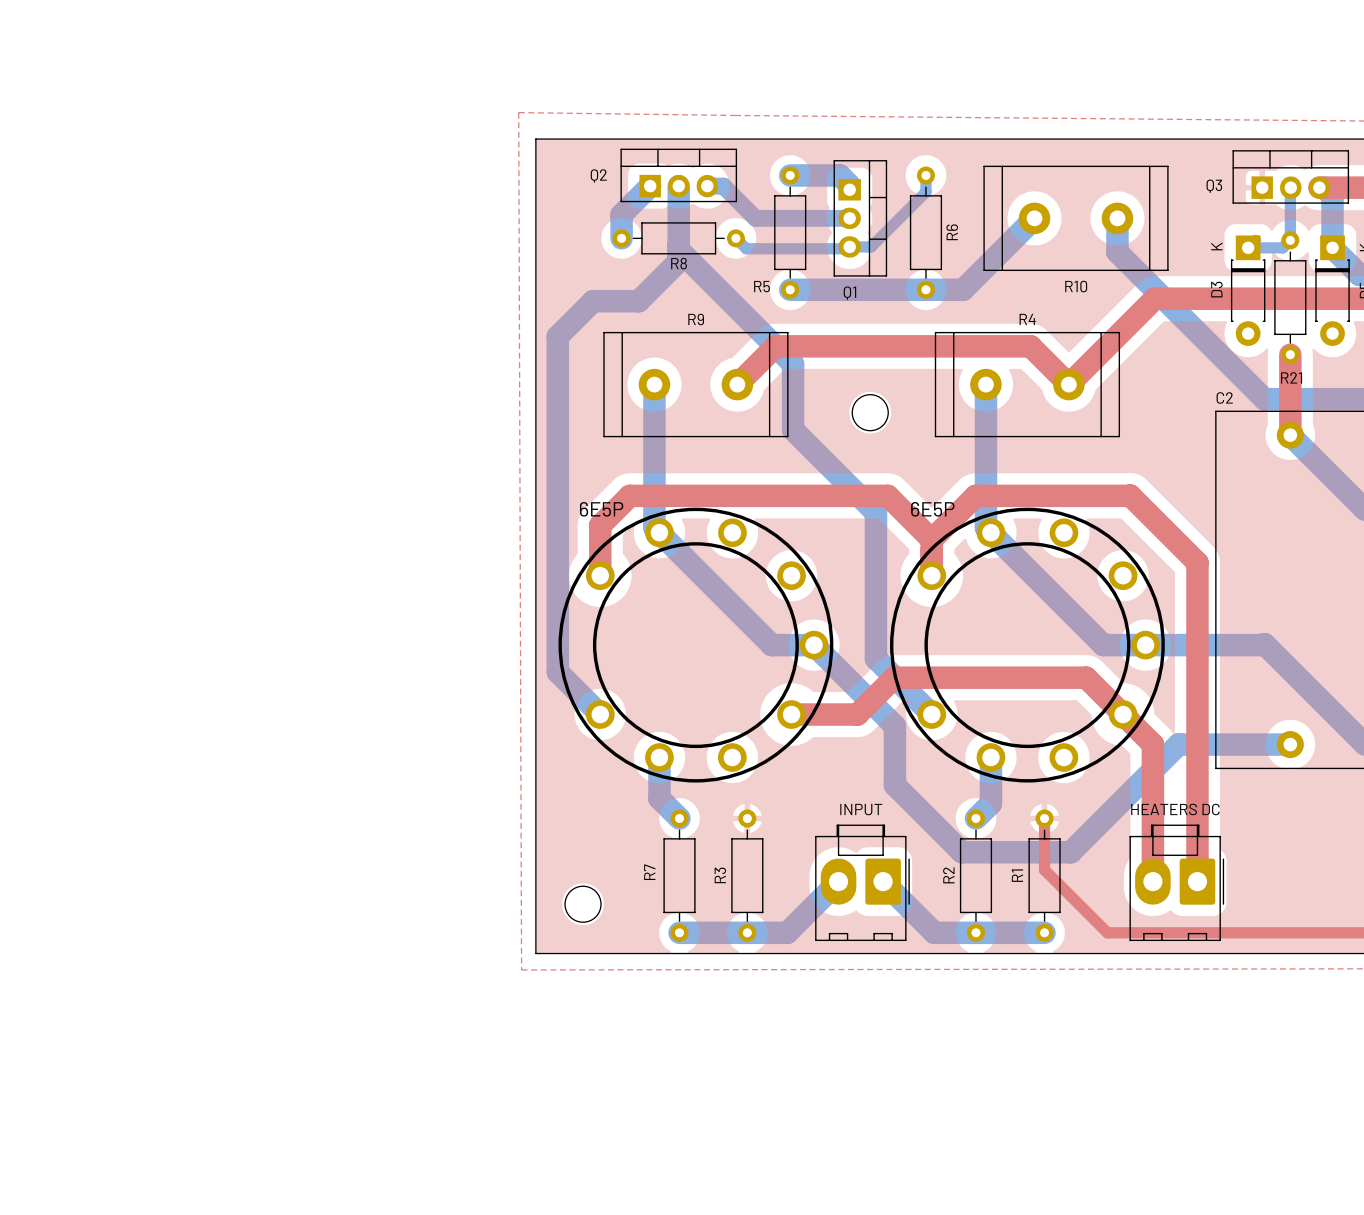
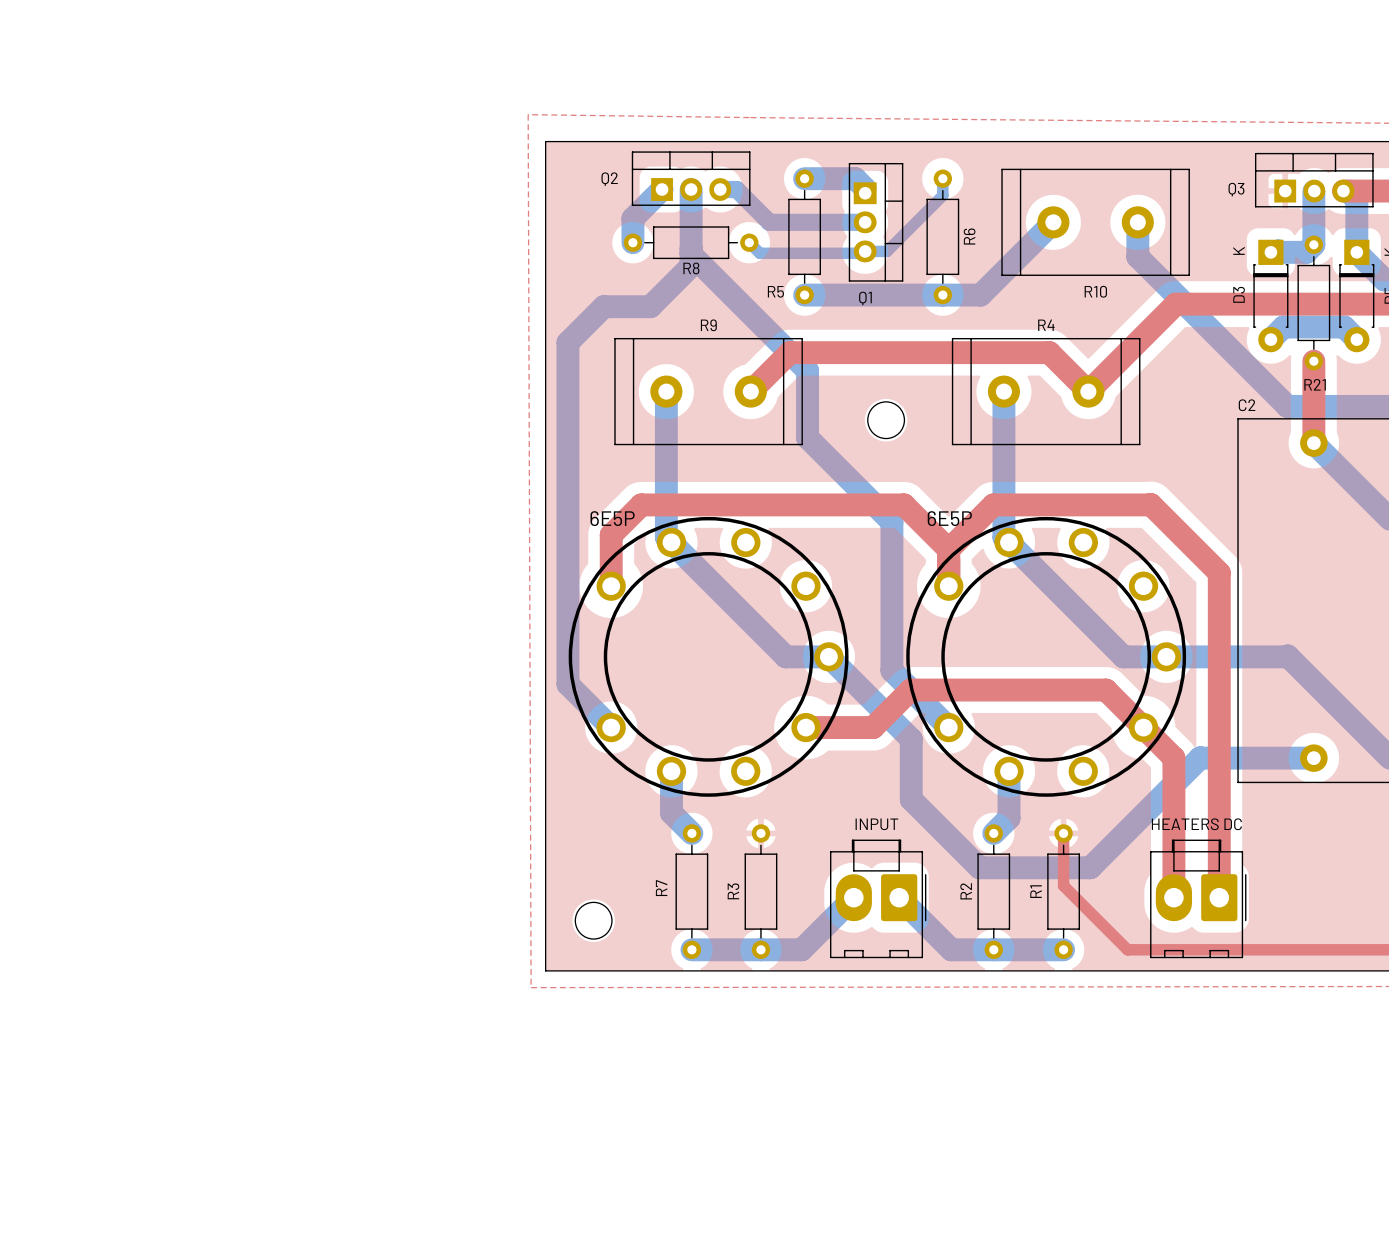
bottom track width: thin (1290, 188) (1290, 240) (1282, 247) (1248, 247) -> thick (1313, 191) (1313, 244) (1306, 252) (1270, 252)
bottom track: none -> (1270, 339) (1283, 327) (1344, 327) (1356, 339)

